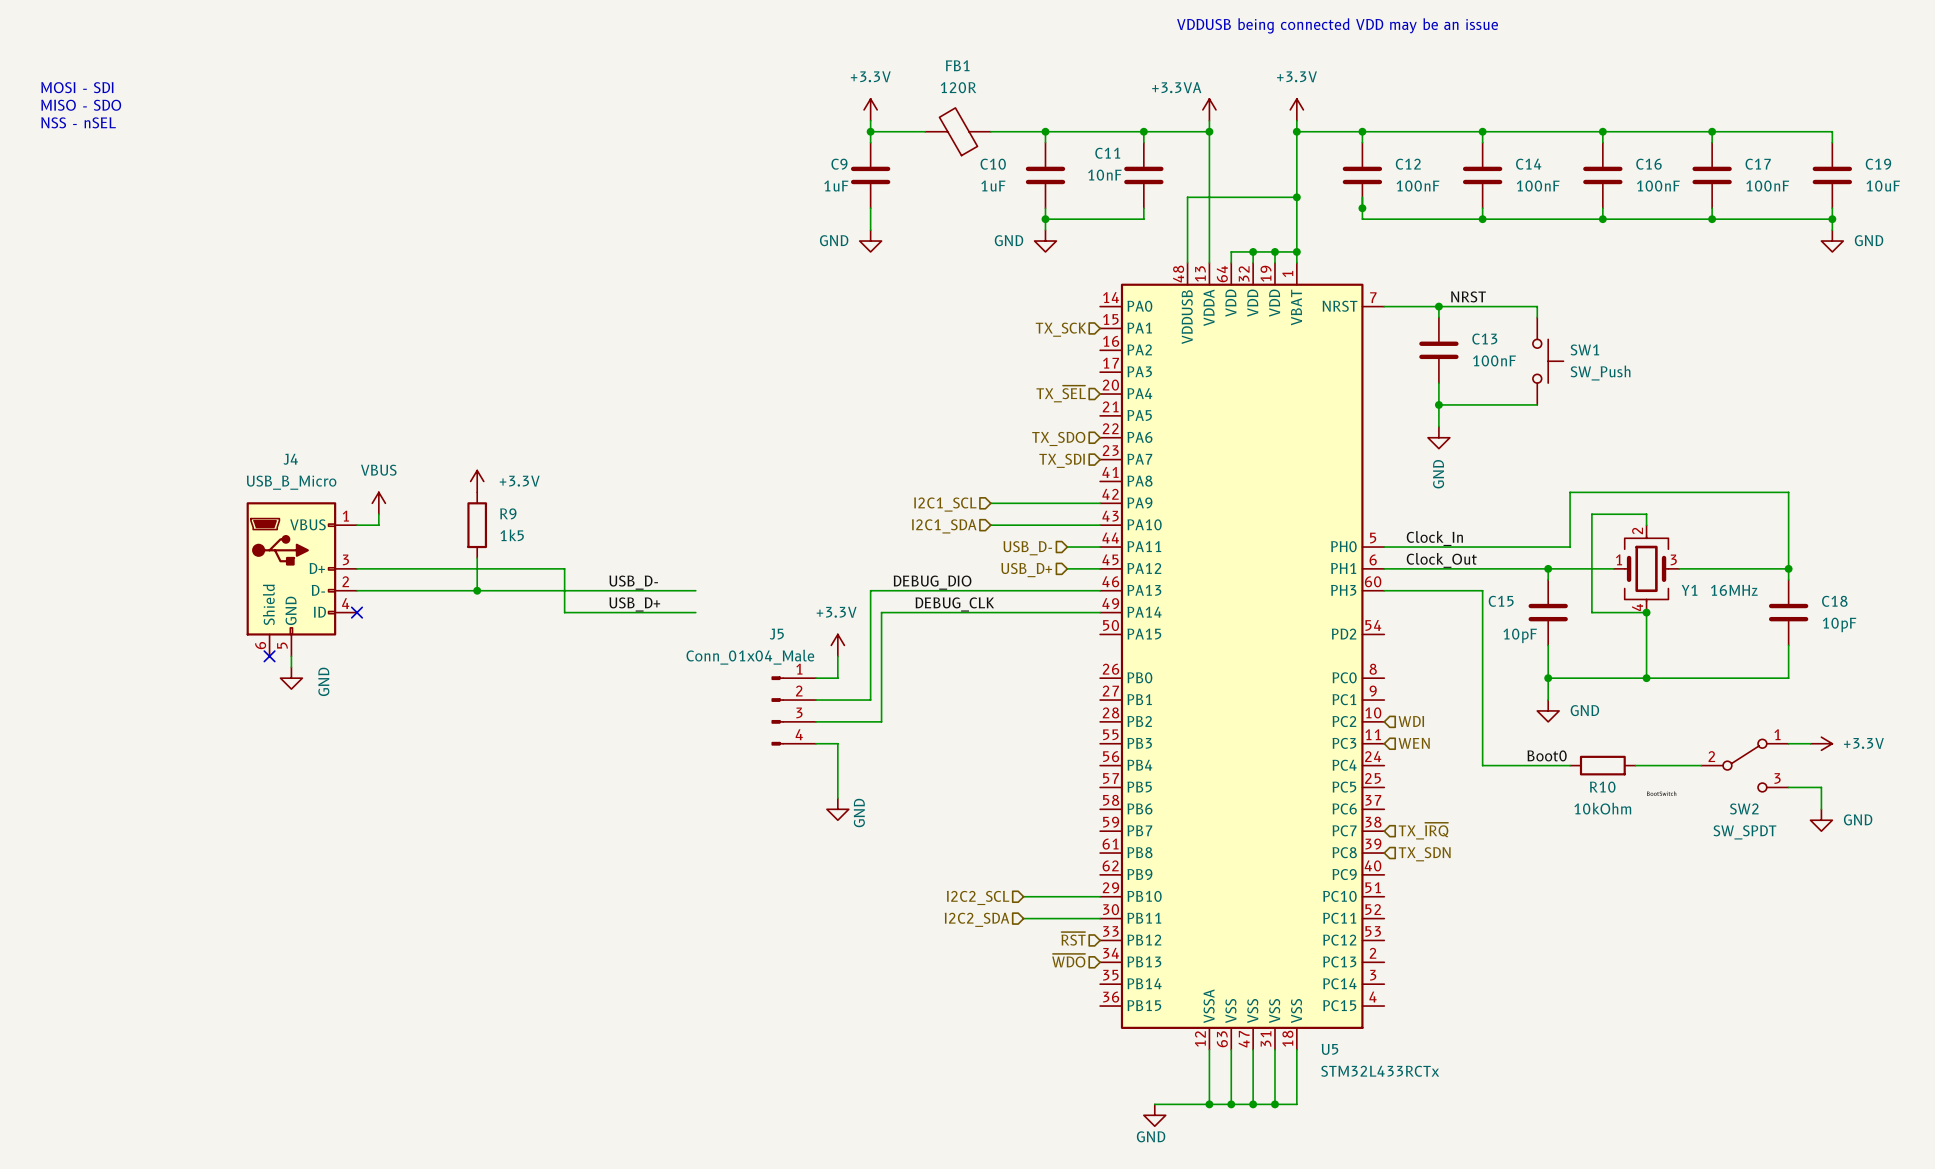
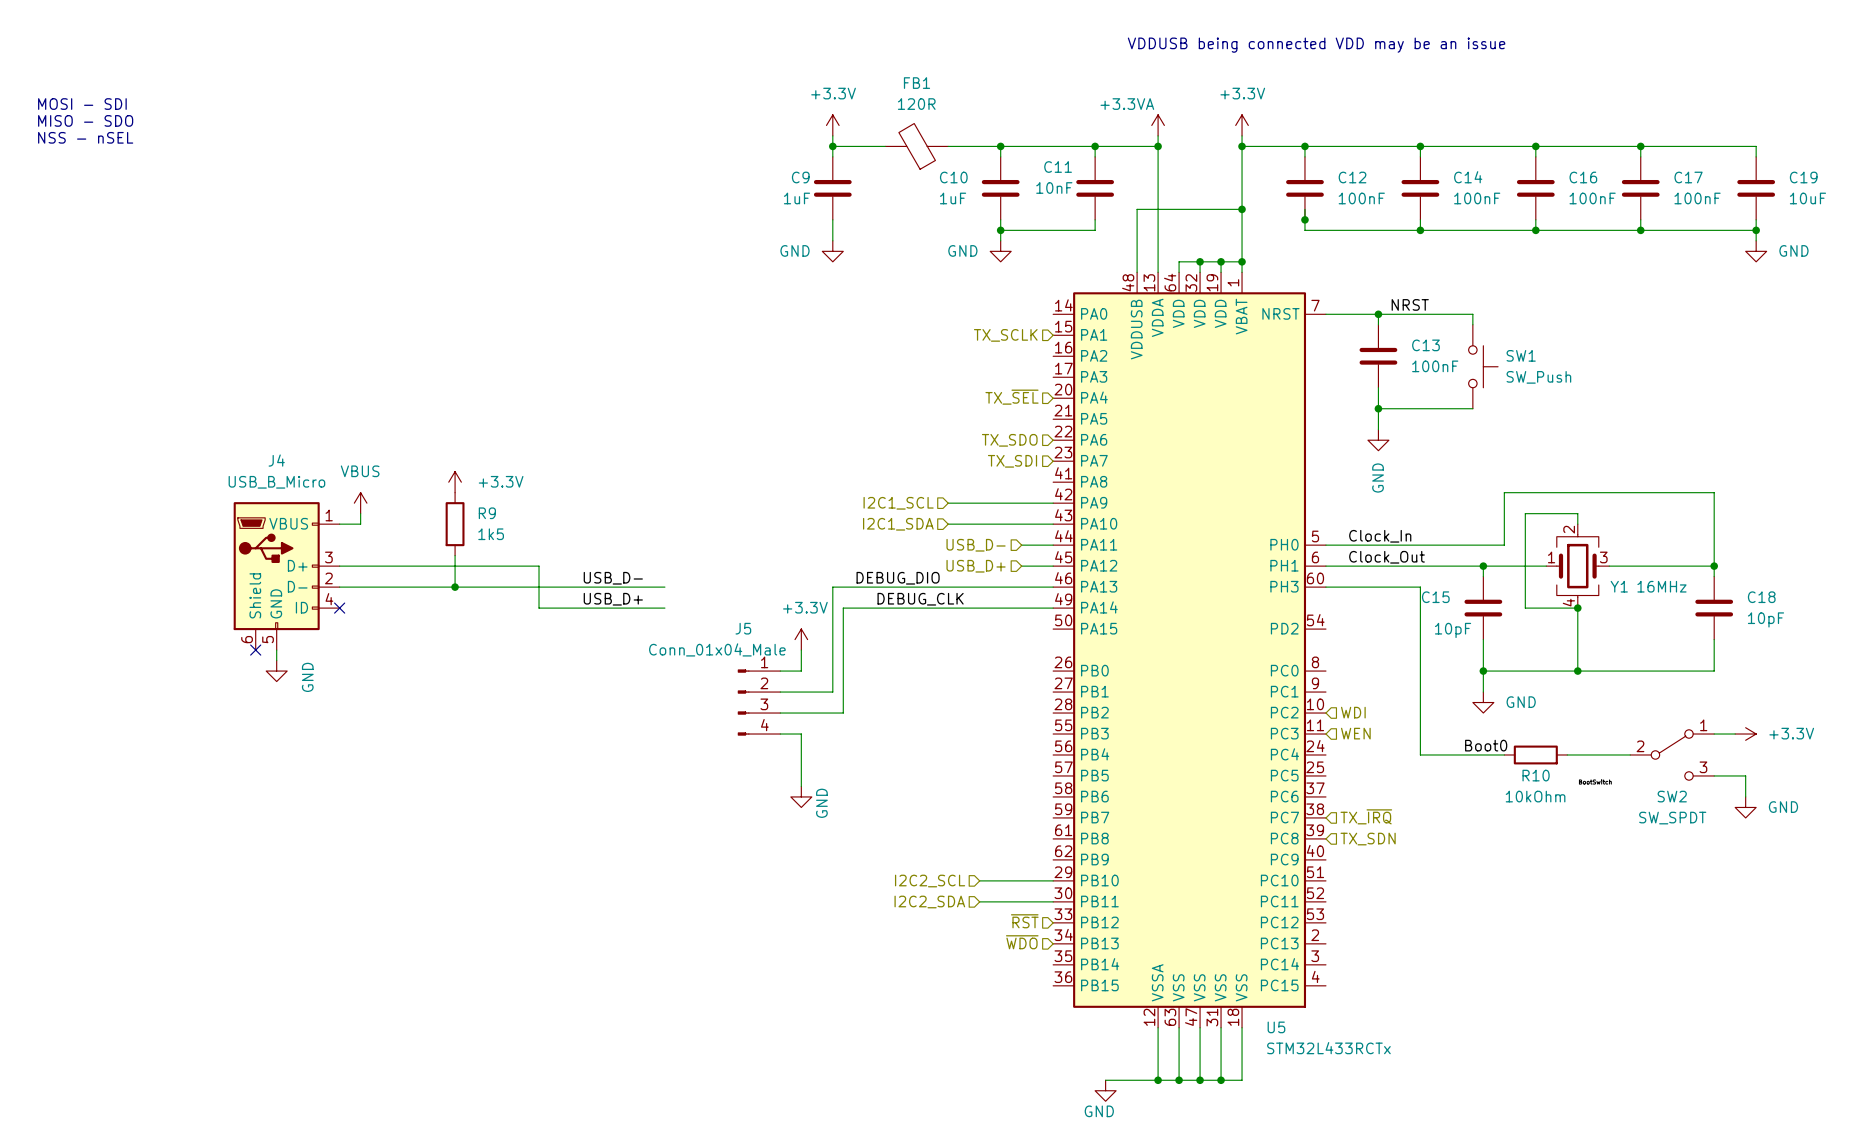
hierarchical label: TX_SCK (1060, 329) -> TX_SCLK (1005, 335)

